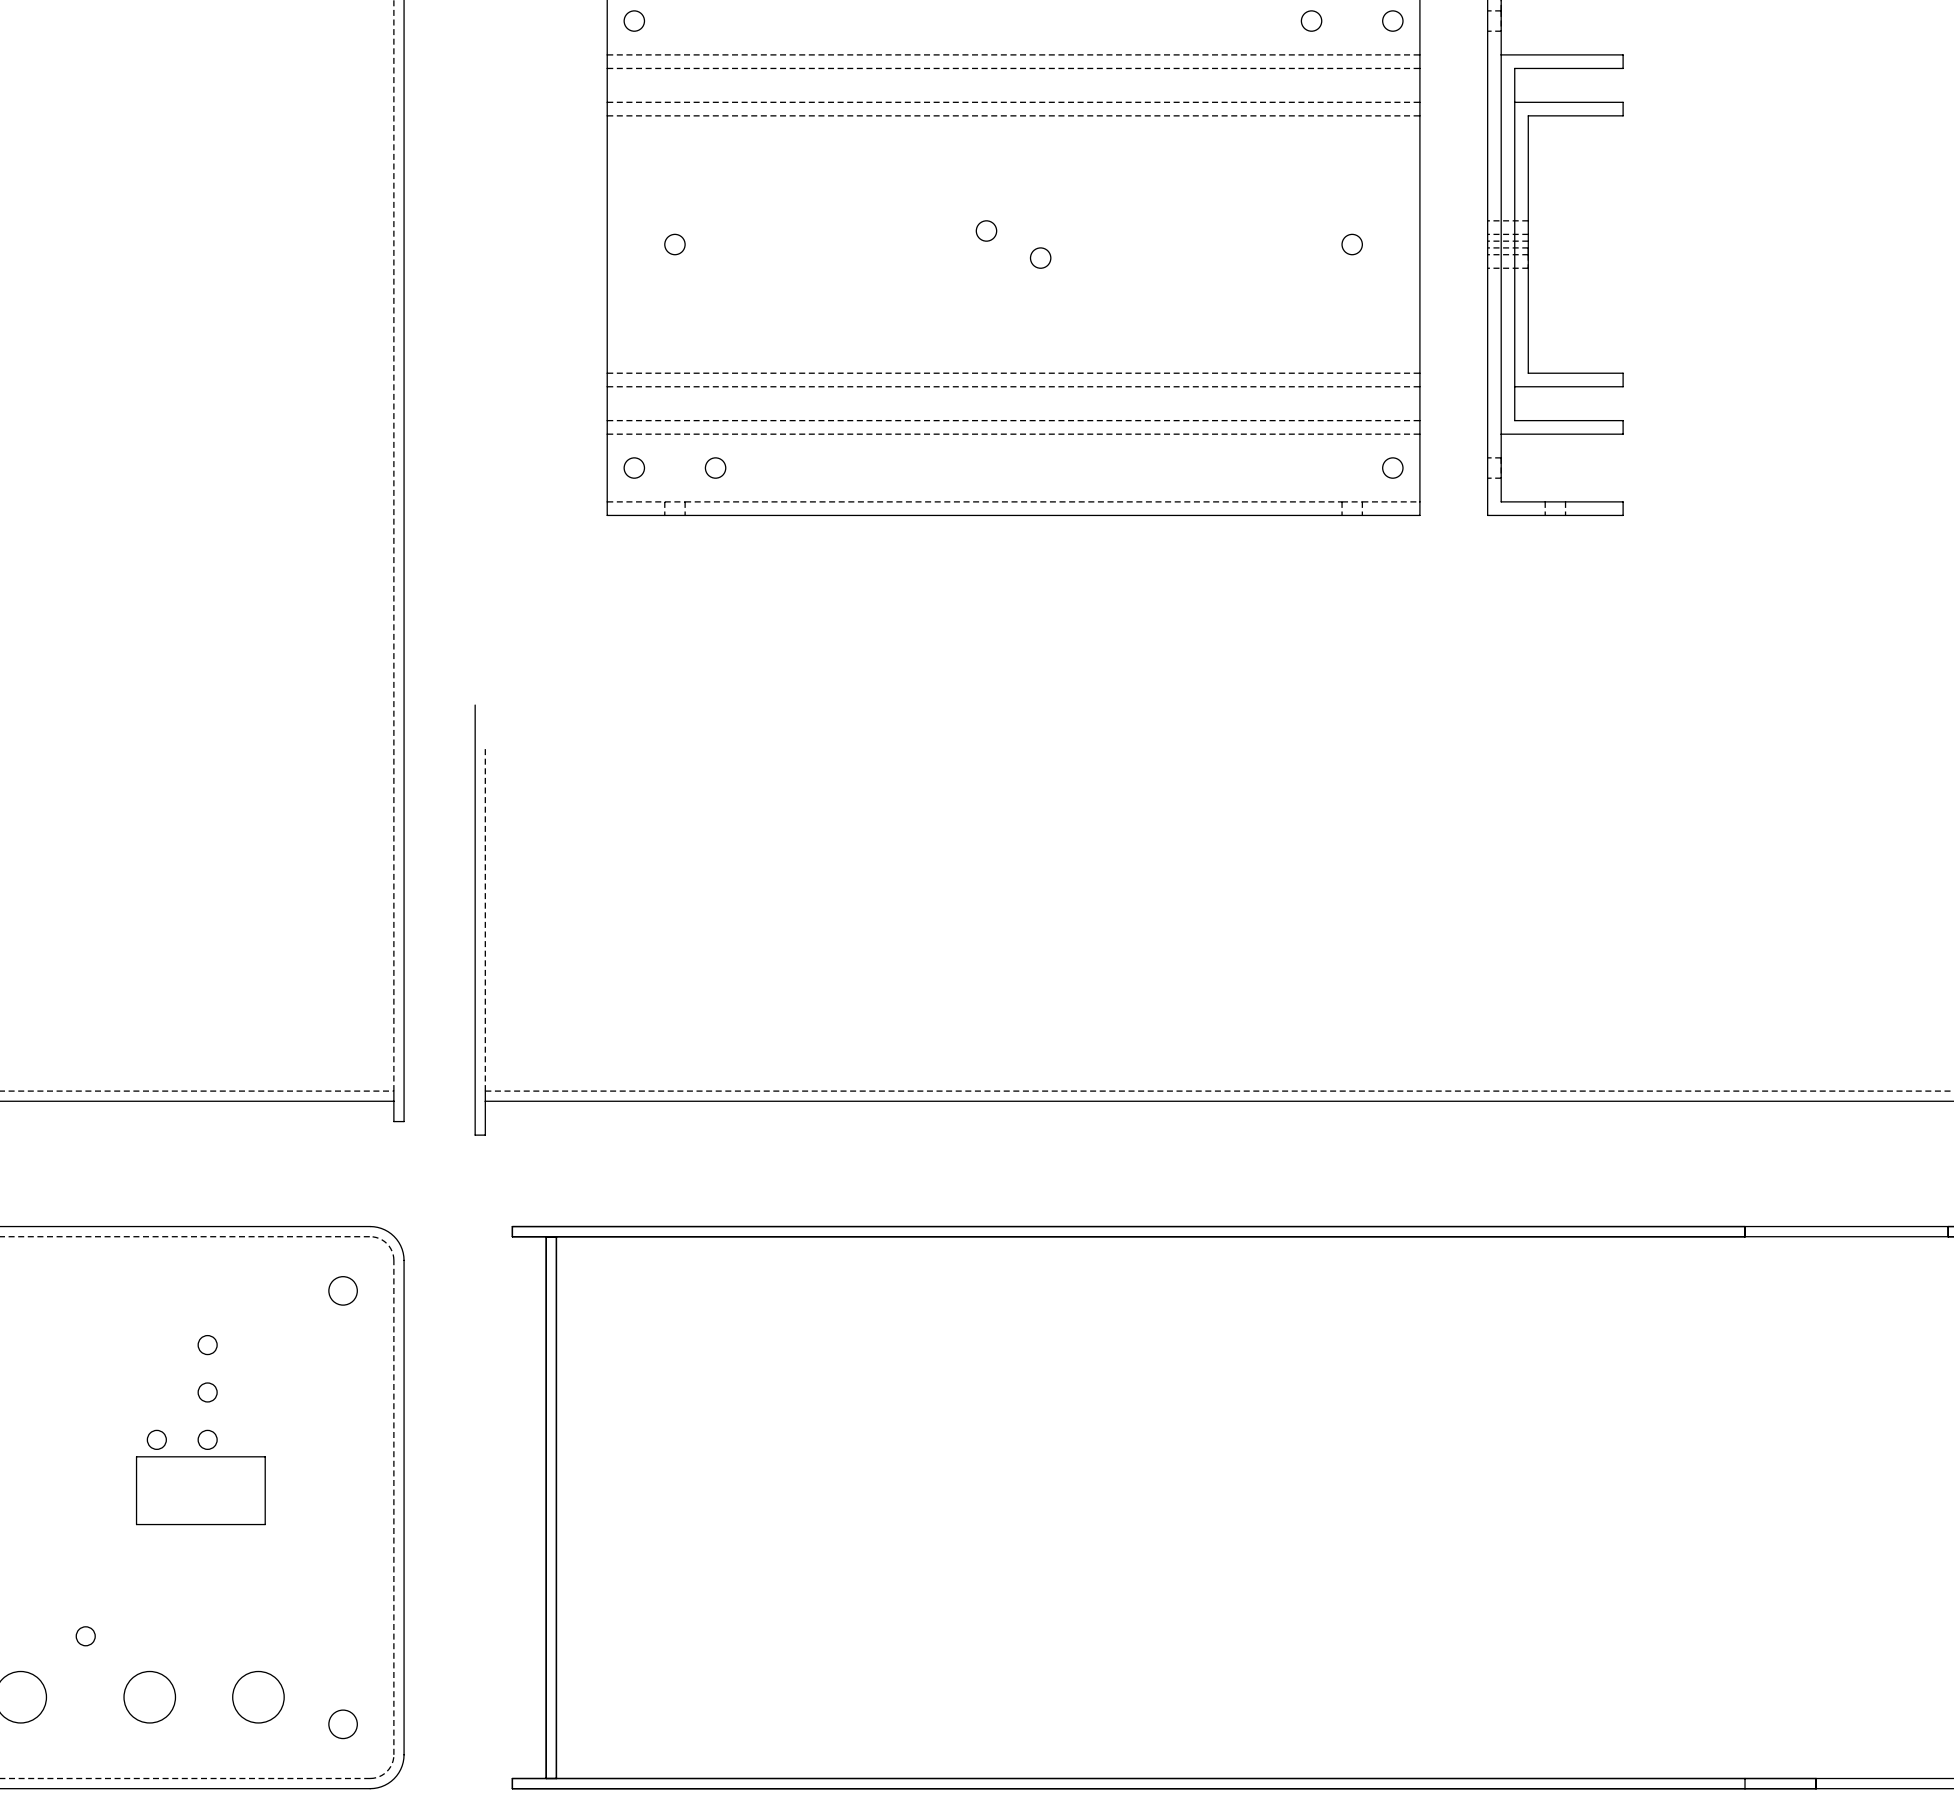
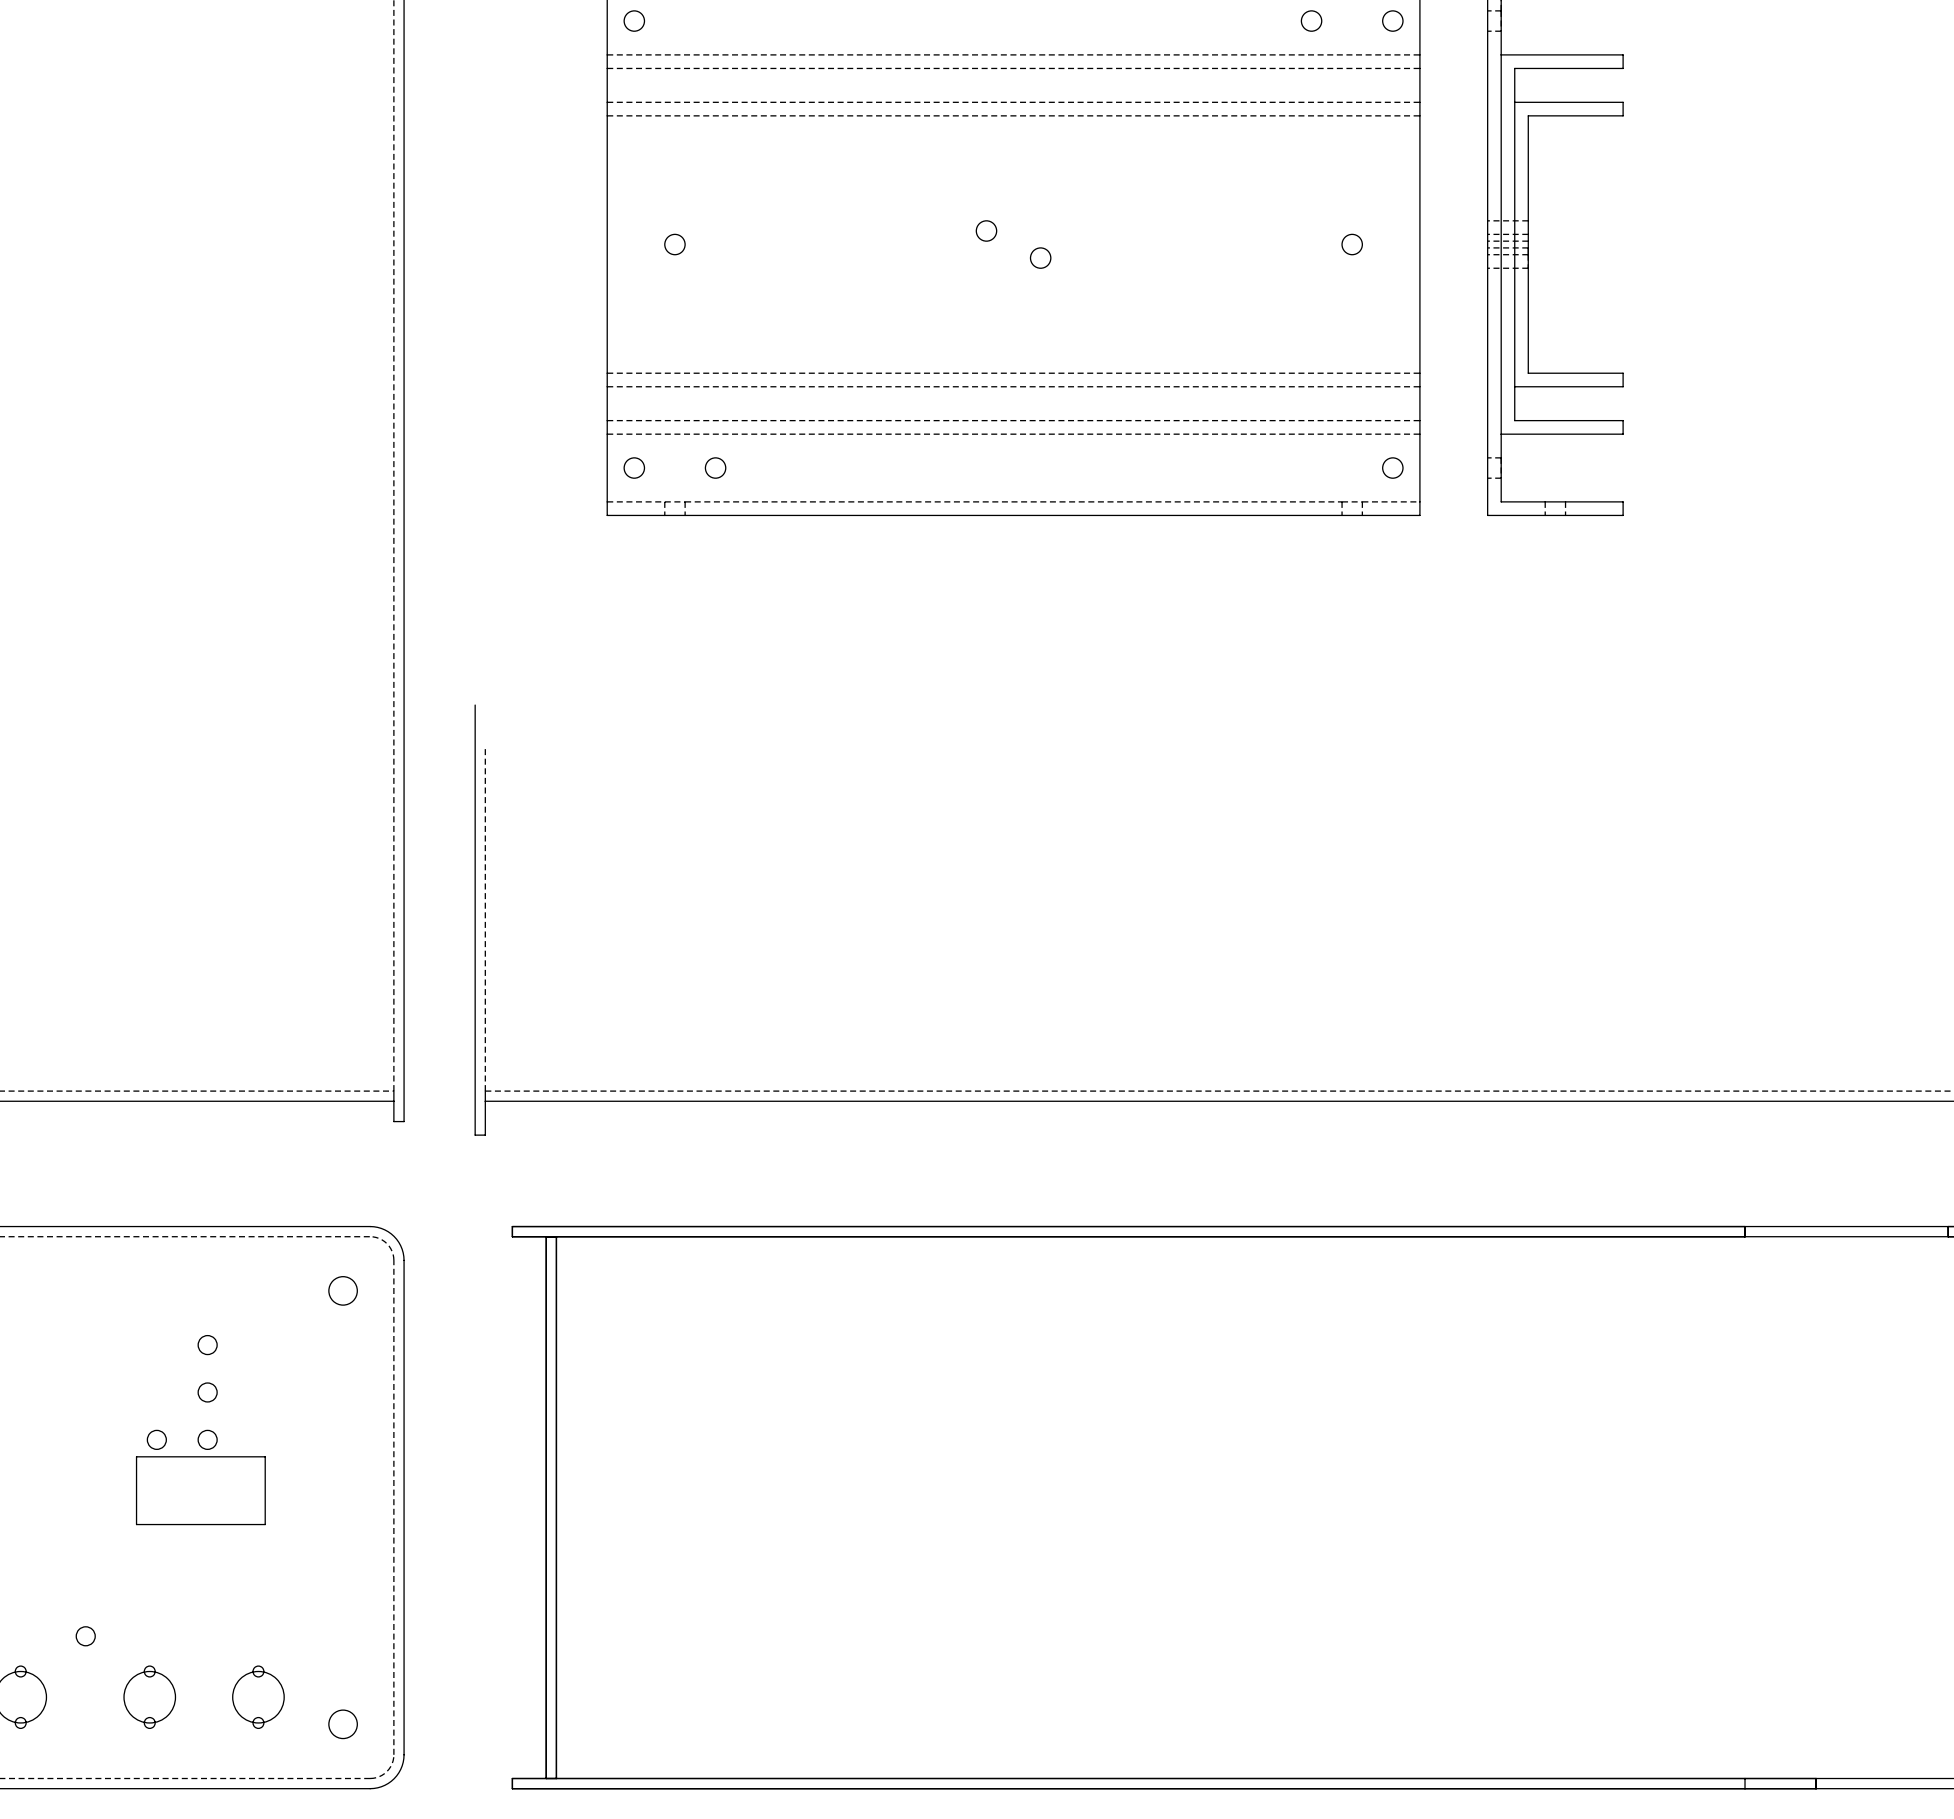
round board edge: none -> [14, 1665, 27, 1678]
round board edge: none -> [143, 1665, 156, 1678]
round board edge: none -> [252, 1665, 265, 1678]
round board edge: none -> [14, 1717, 27, 1729]
round board edge: none -> [143, 1717, 156, 1729]
round board edge: none -> [252, 1717, 265, 1729]

